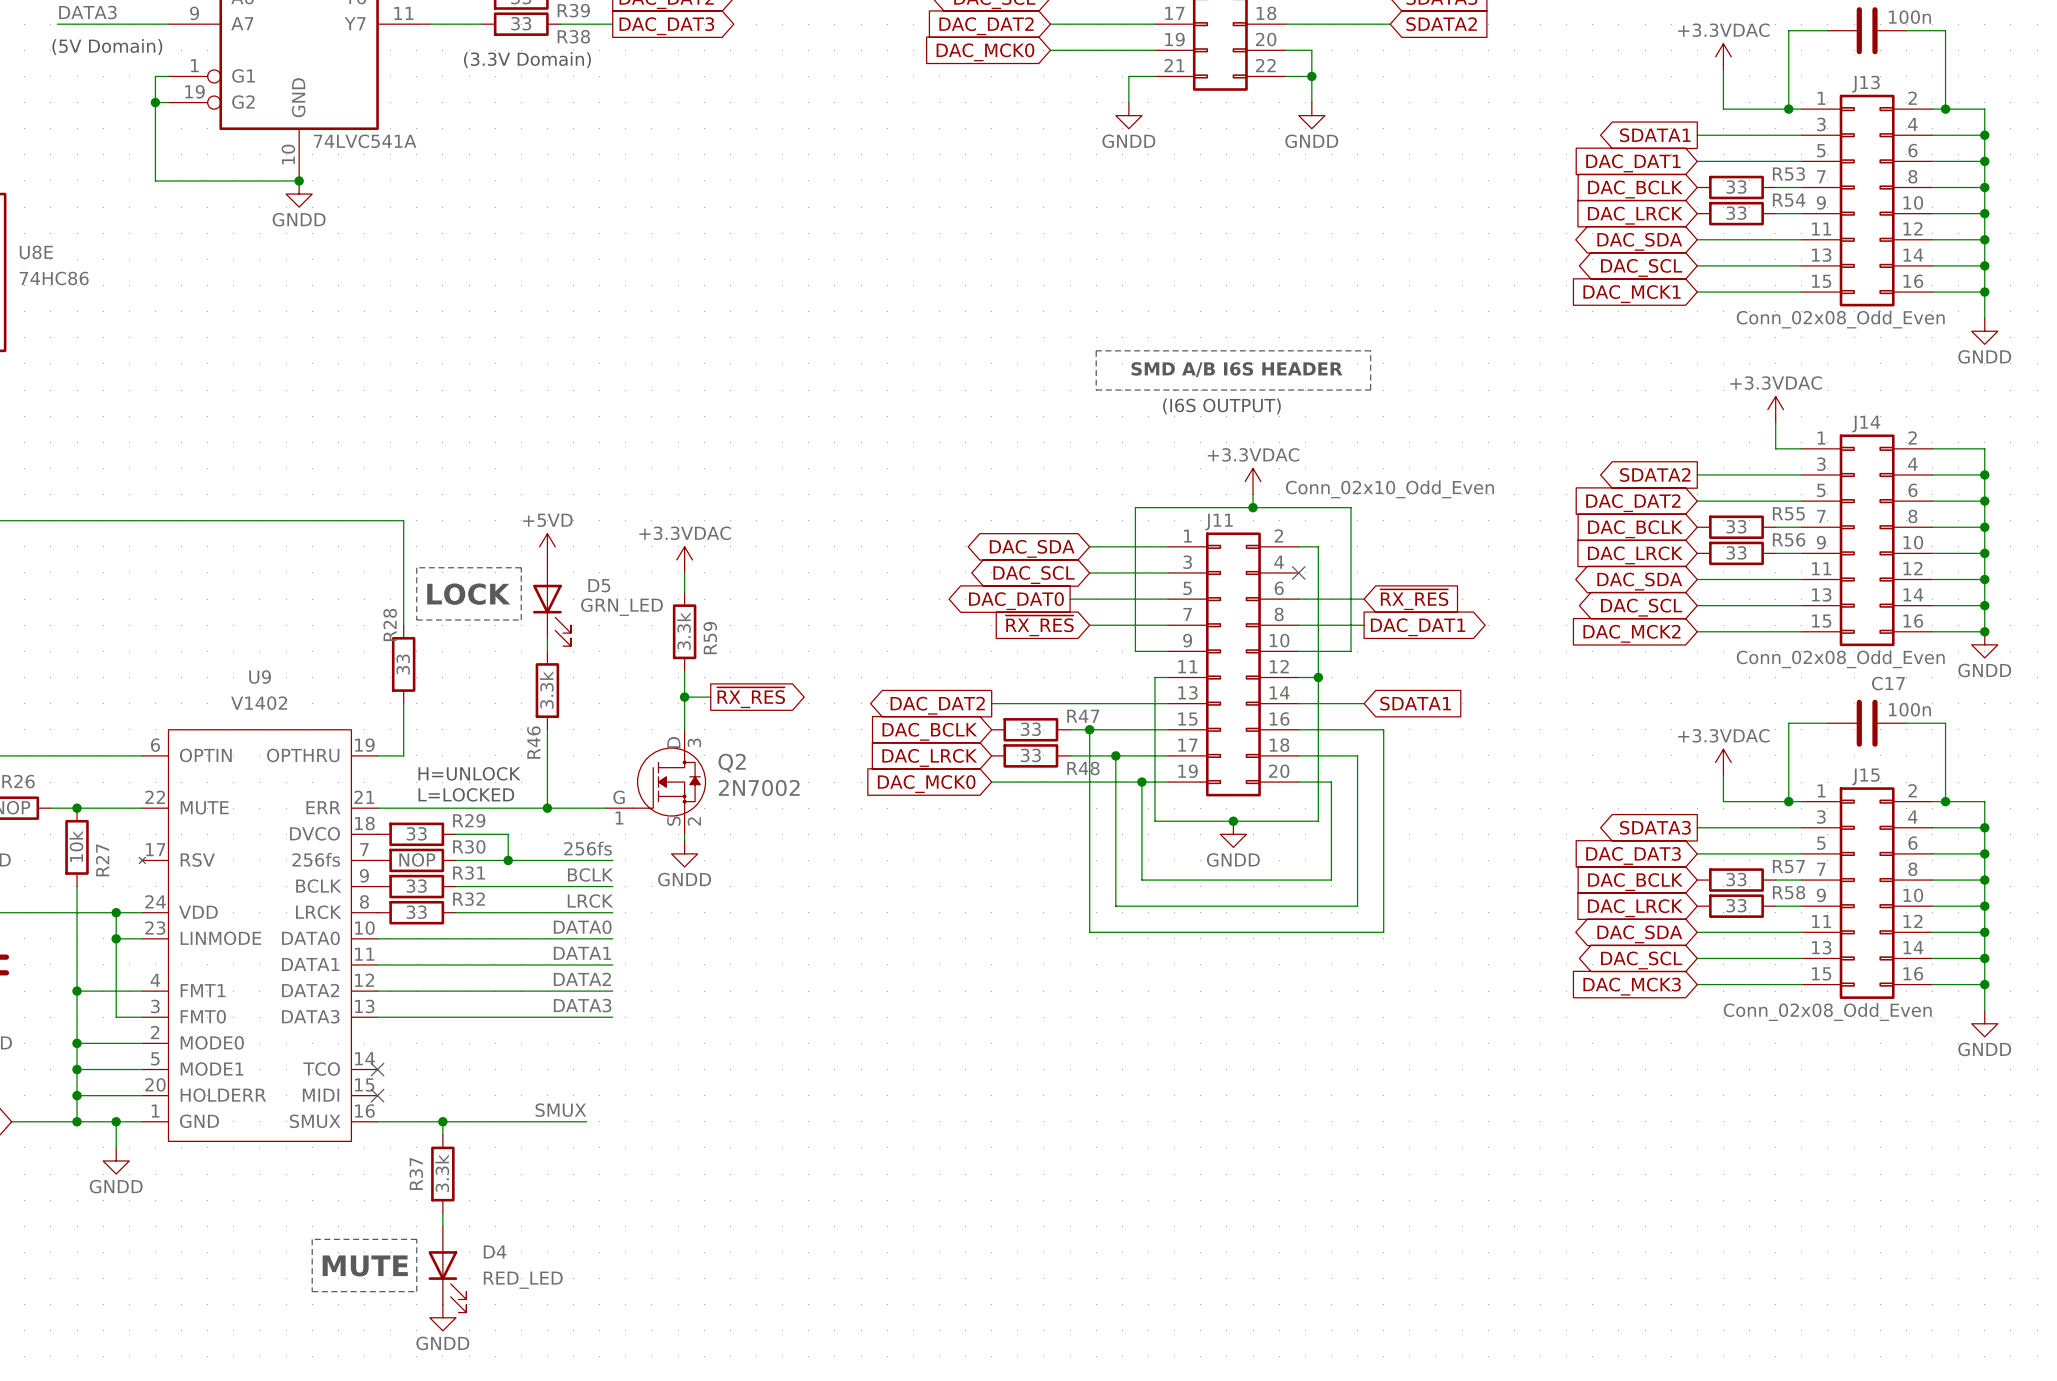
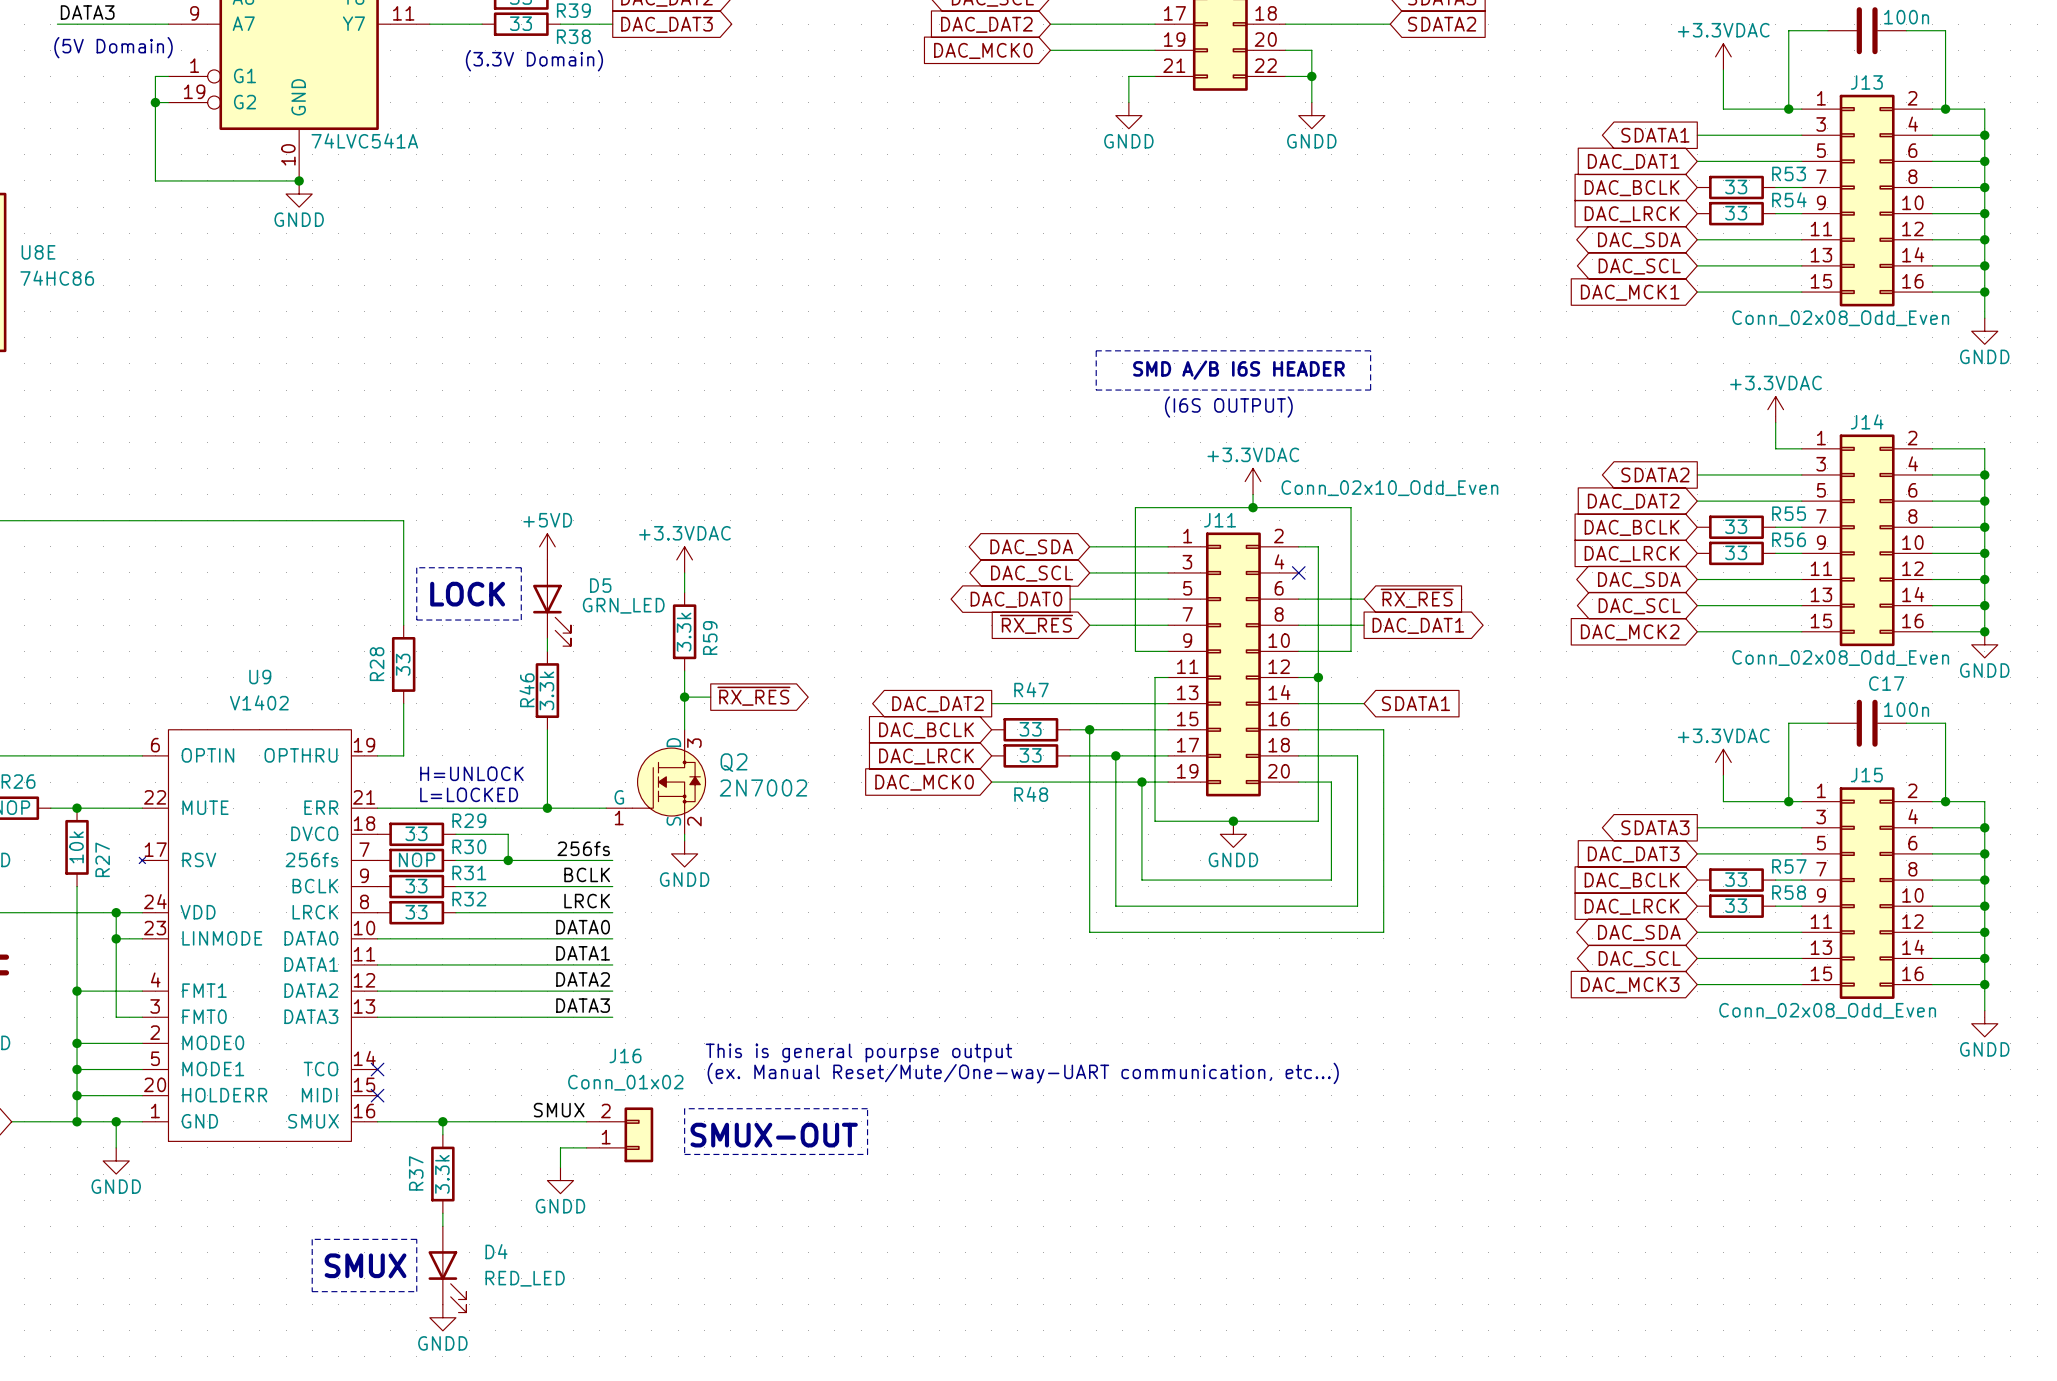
R28 name position: R28 (390, 624) -> R28 (377, 664)
R47 name position: R47 (1083, 716) -> R47 (1031, 689)
R46 name position: R46 (533, 742) -> R46 (527, 690)
R48 name position: R48 (1083, 768) -> R48 (1031, 794)
text: none -> This is general pourpse output (858, 1053)
text: none -> (ex. Manual Reset/Mute/One-way-UART communication, etc…) (1023, 1073)
line: none -> (684, 1108) (684, 1154) (867, 1154) (867, 1108) (684, 1108)
J16: none -> Conn_01x02 (619, 1134)
text: none -> SMUX-OUT (774, 1135)
wire: none -> (586, 1147) (560, 1147) (560, 1167)
power symbol: none -> GNDD (560, 1180)
text: MUTE (365, 1265) -> SMUX (365, 1265)

